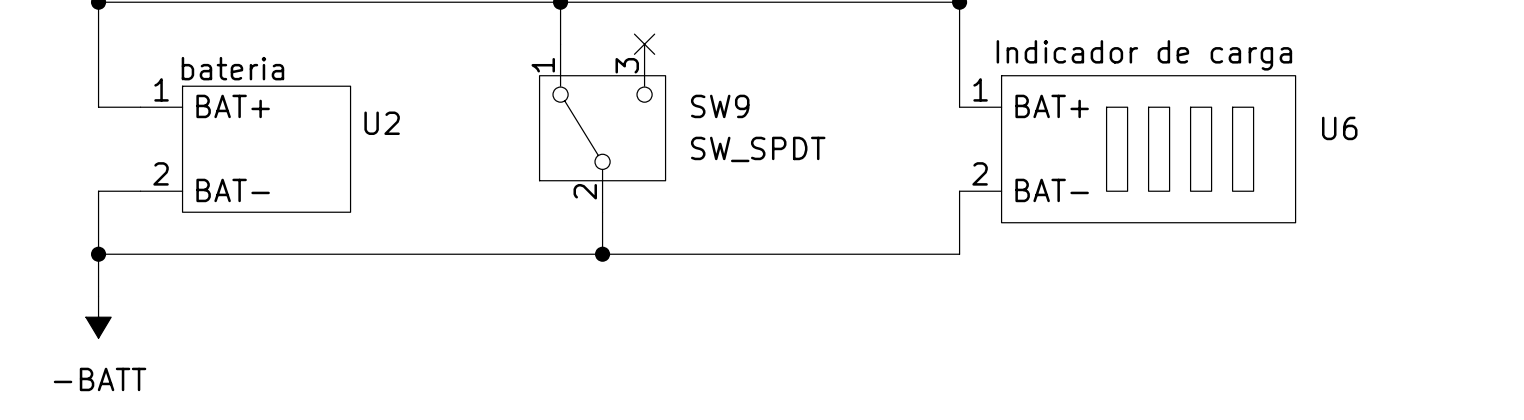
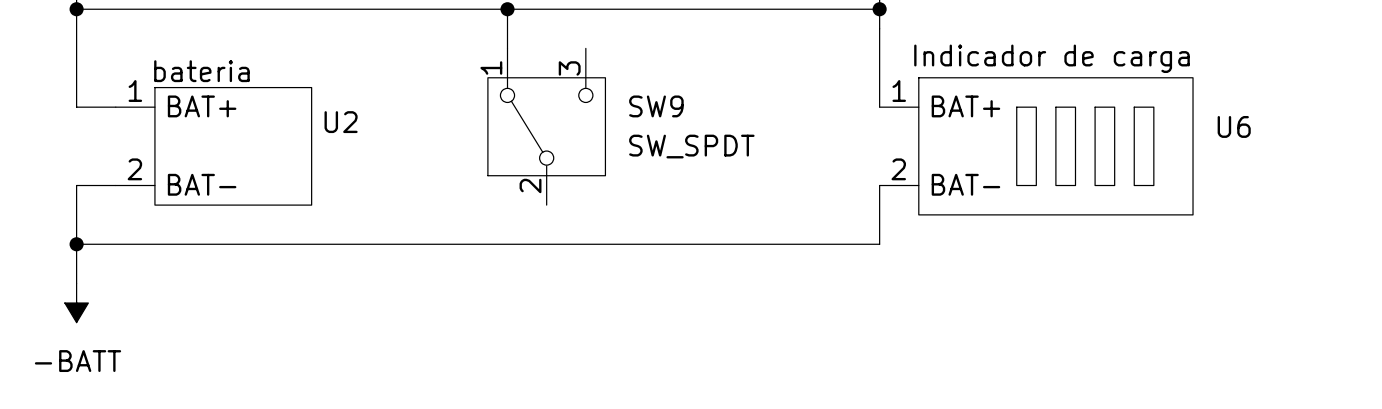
no-connect mark: (644, 44) -> none
wire: (602, 212) (602, 254) -> none
junction: (602, 254) -> none

